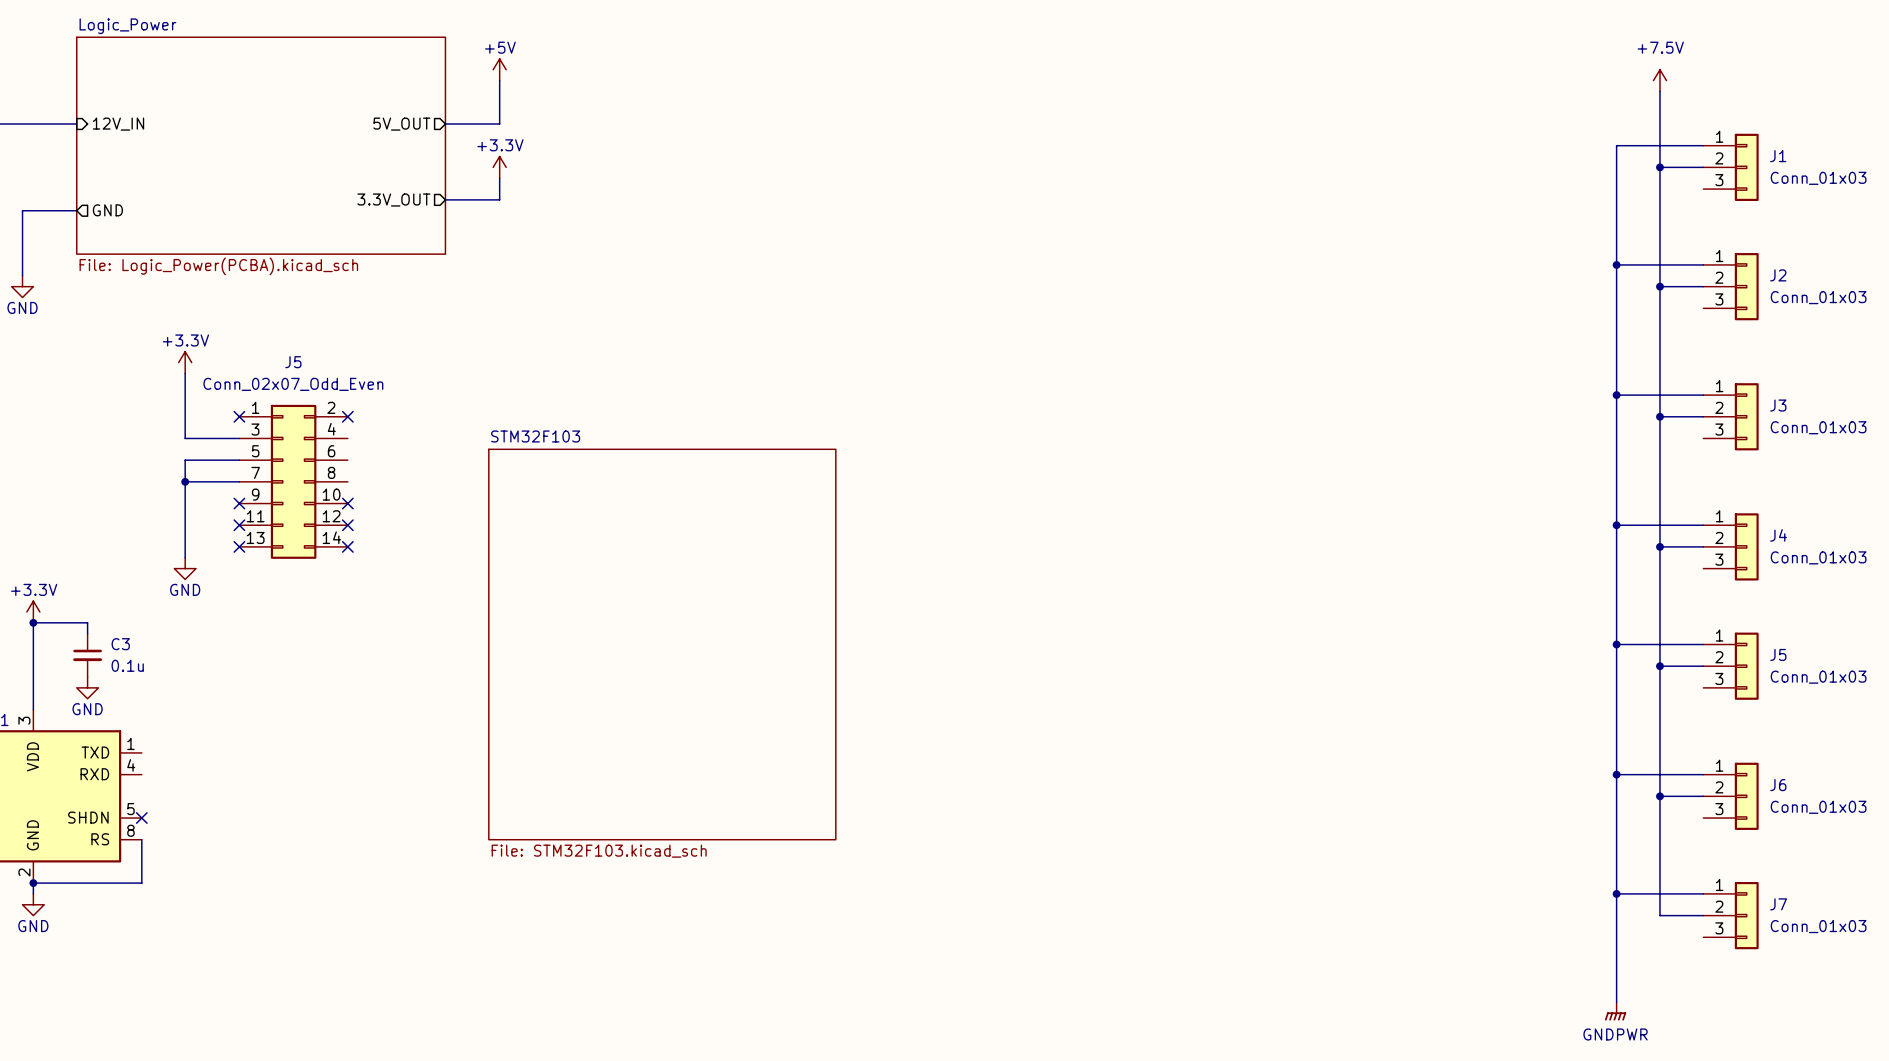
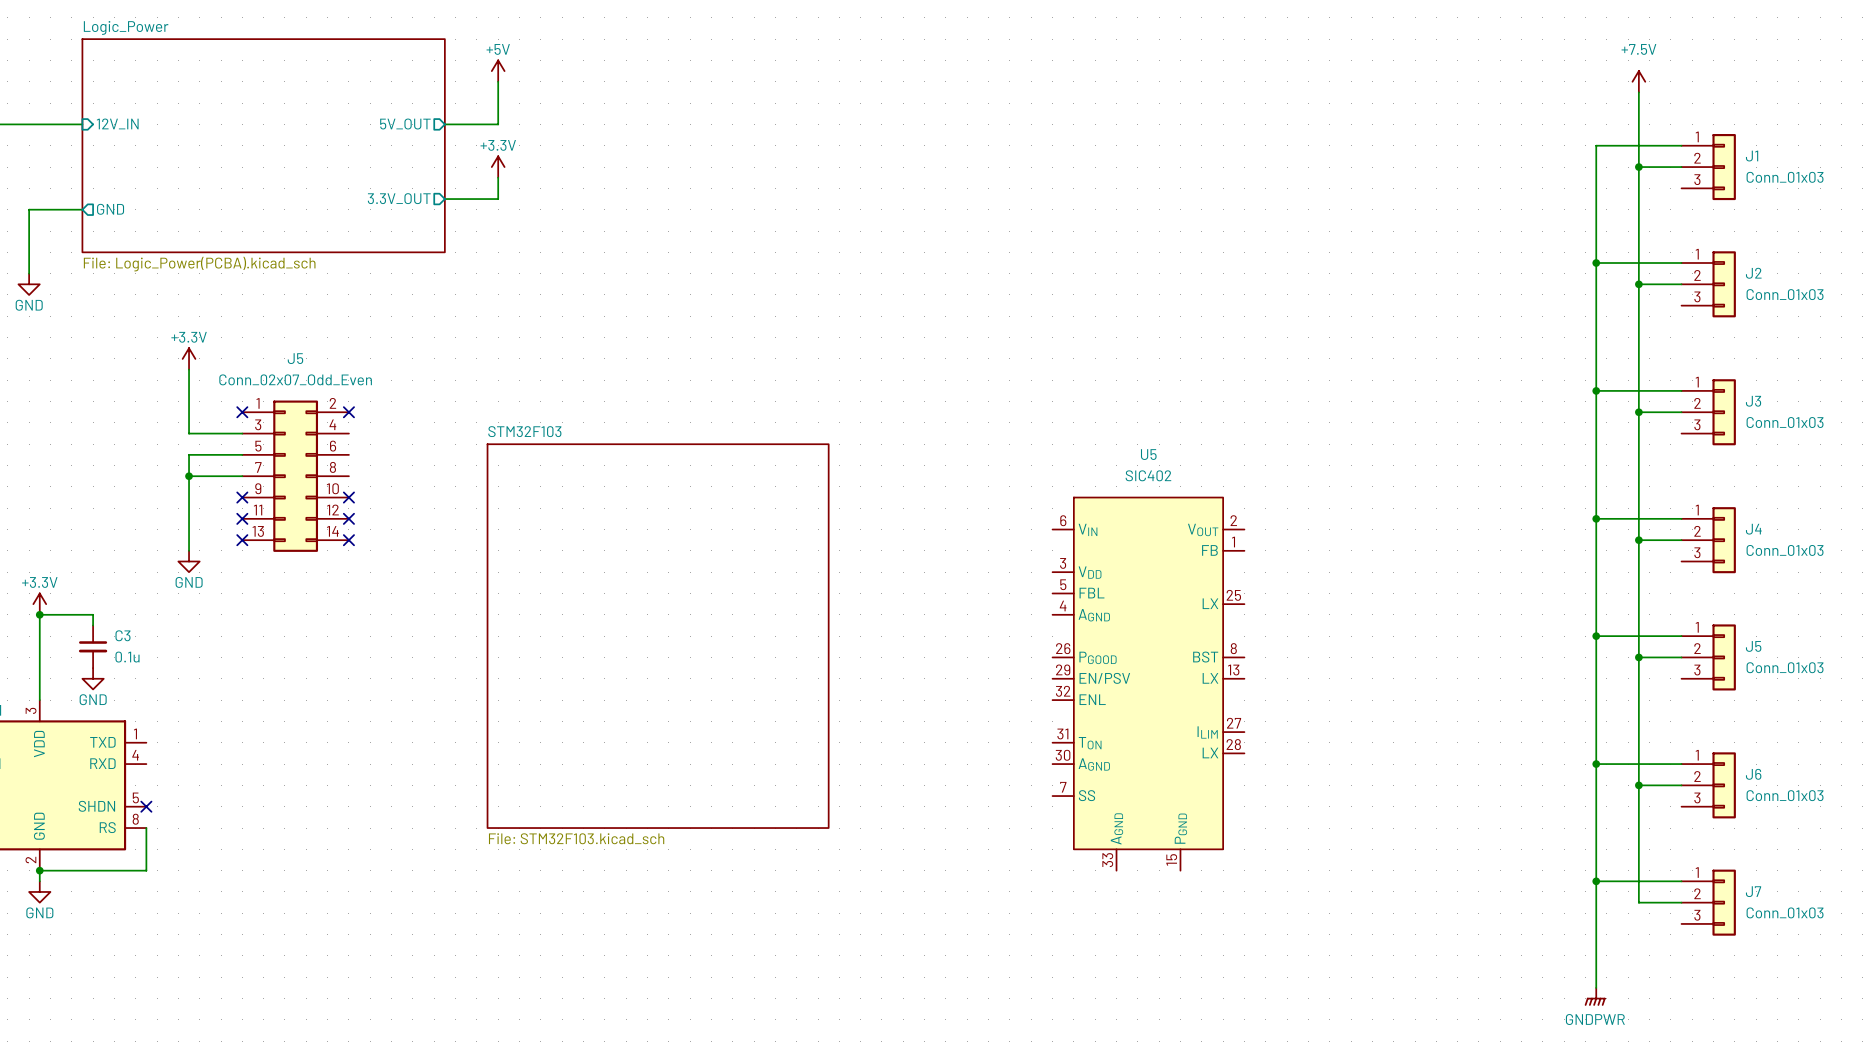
U5: none -> SIC402 (1148, 684)

